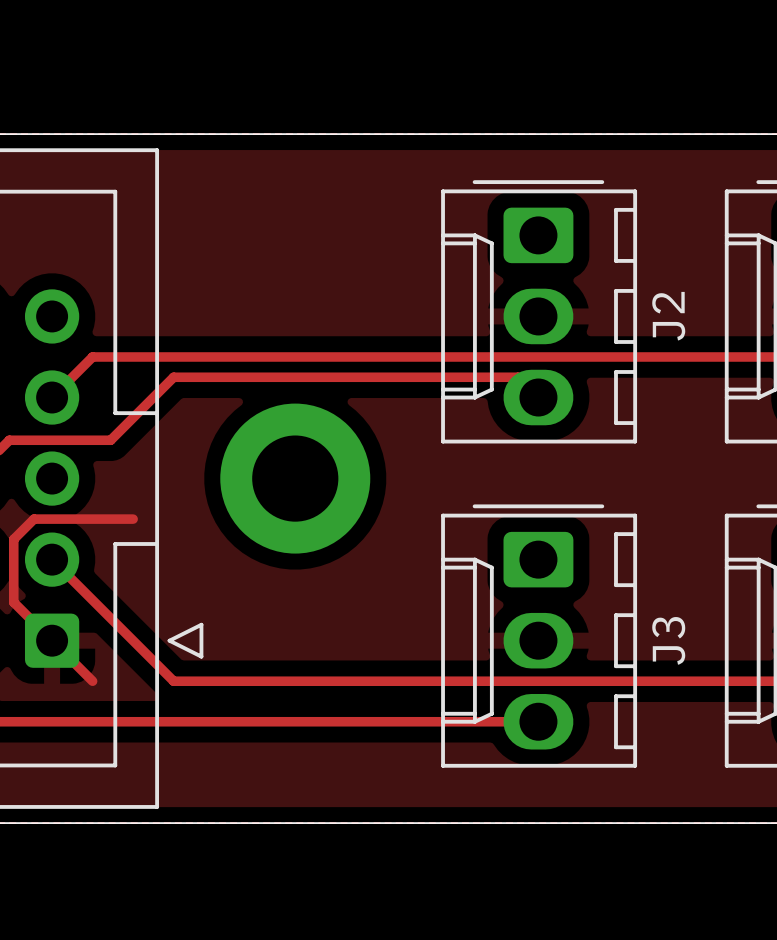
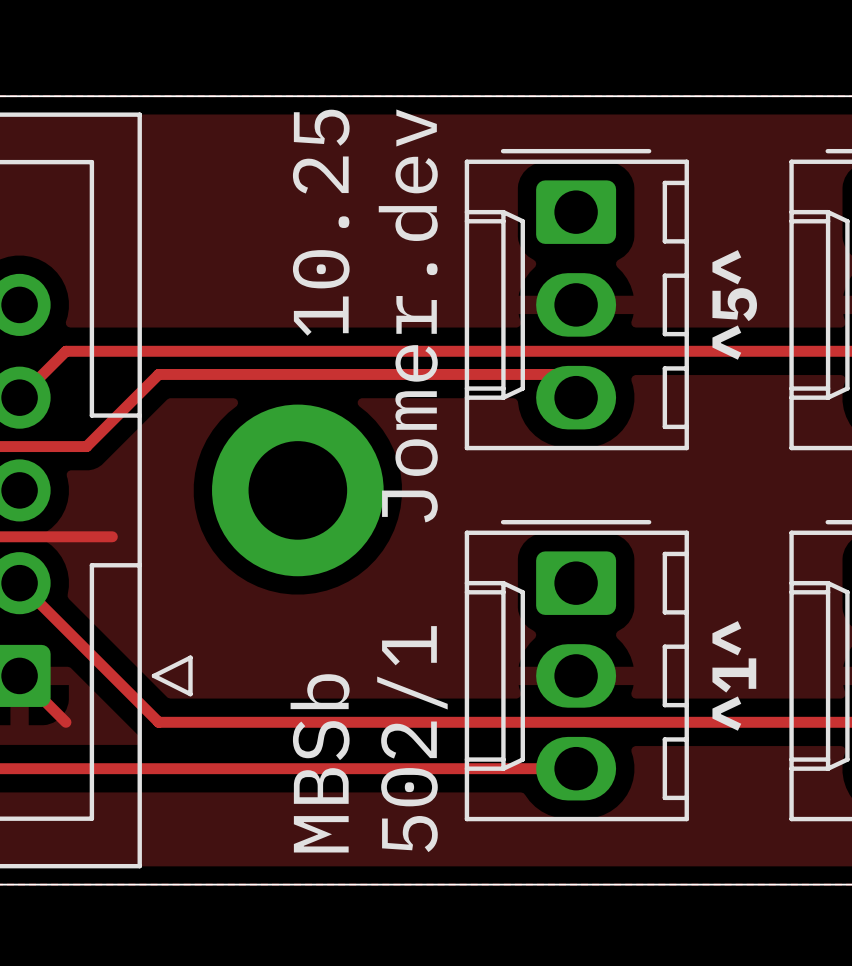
J2 name: J2 (668, 316) -> none
text: none -> ^5^ (734, 304)
text: none -> MBSb 10.25 (320, 481)
text: none -> 502/1 Jomer.dev (412, 480)
J3 name: J3 (668, 640) -> none
text: none -> ^1^ (734, 675)

